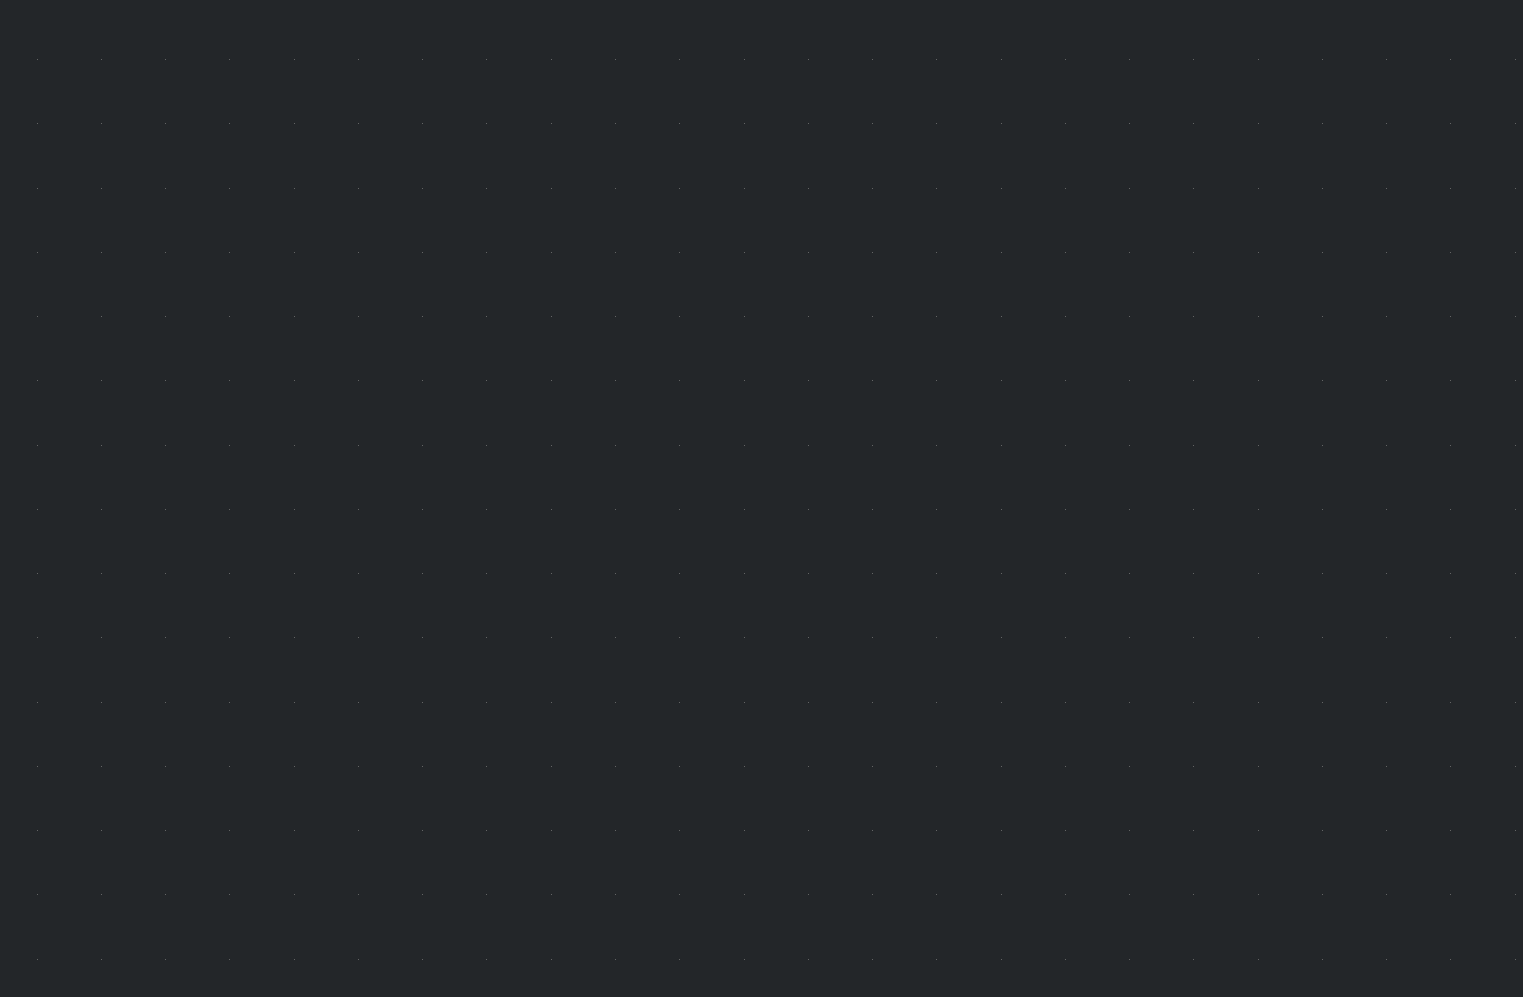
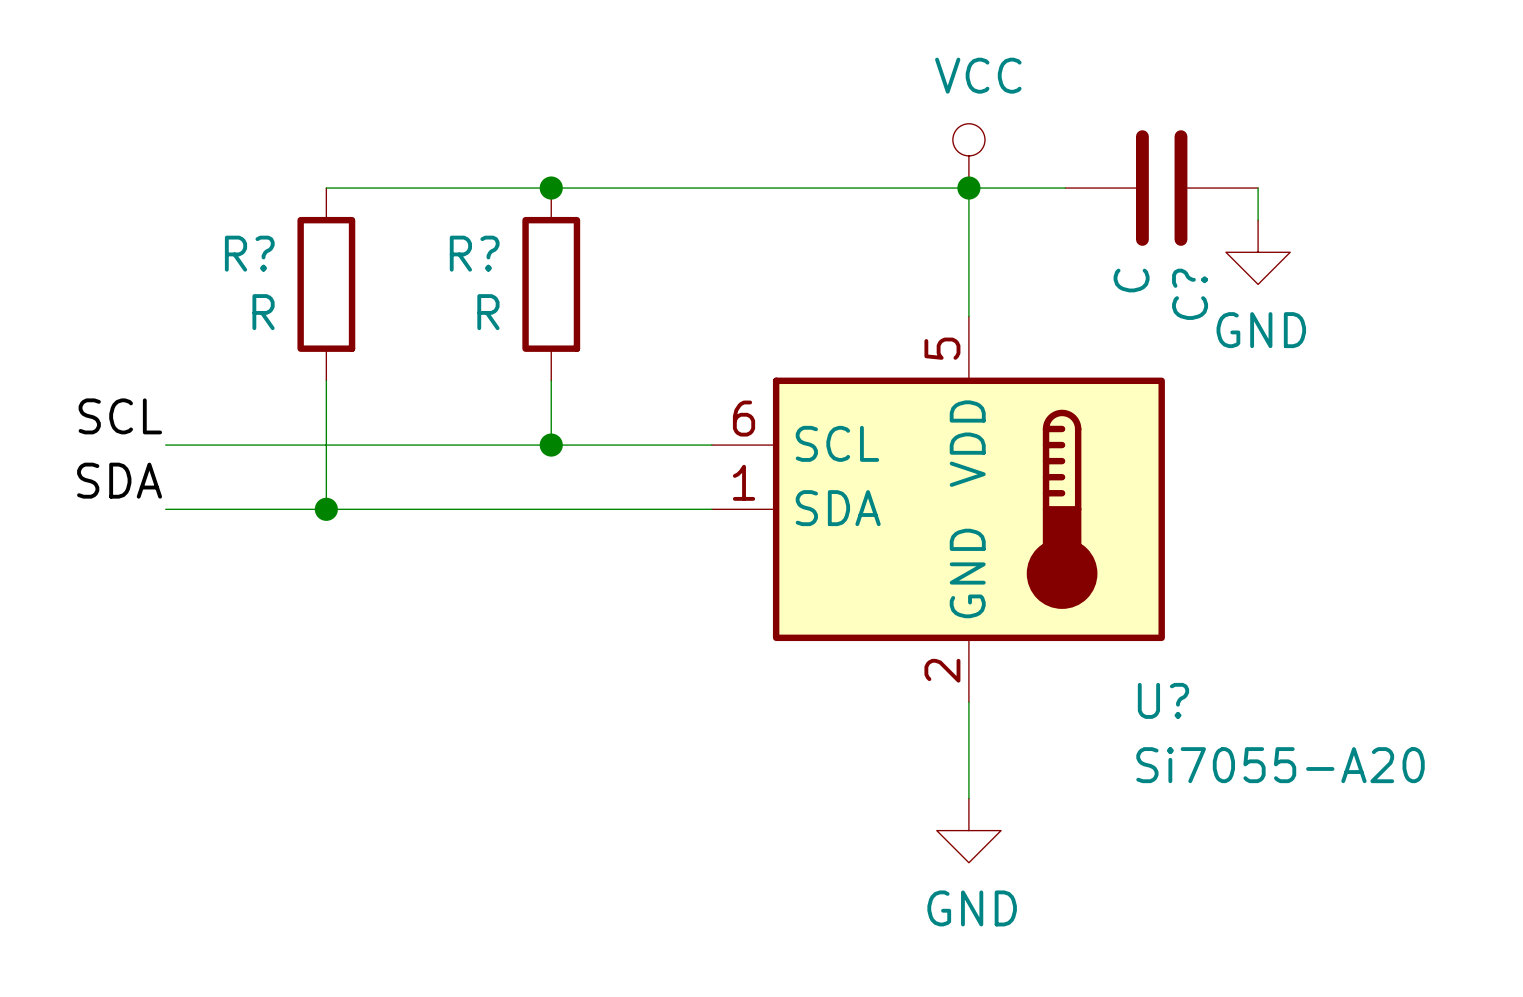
power symbol: none -> VCC (968, 155)
wire: none -> (326, 188) (1065, 188)
junction: none -> (551, 188)
wire: none -> (968, 188) (968, 316)
junction: none -> (968, 188)
C?: none -> C (1161, 188)
wire: none -> (1258, 188) (1258, 220)
power symbol: none -> GND (1258, 252)
R?: none -> R (326, 284)
R?: none -> R (551, 284)
wire: none -> (326, 380) (326, 509)
wire: none -> (551, 380) (551, 445)
label: none -> SCL (120, 416)
wire: none -> (165, 445) (711, 445)
junction: none -> (551, 445)
label: none -> SDA (119, 480)
wire: none -> (165, 509) (711, 509)
junction: none -> (326, 509)
U?: none -> Si7055-A20 (938, 509)
wire: none -> (968, 702) (968, 798)
power symbol: none -> GND (968, 830)

